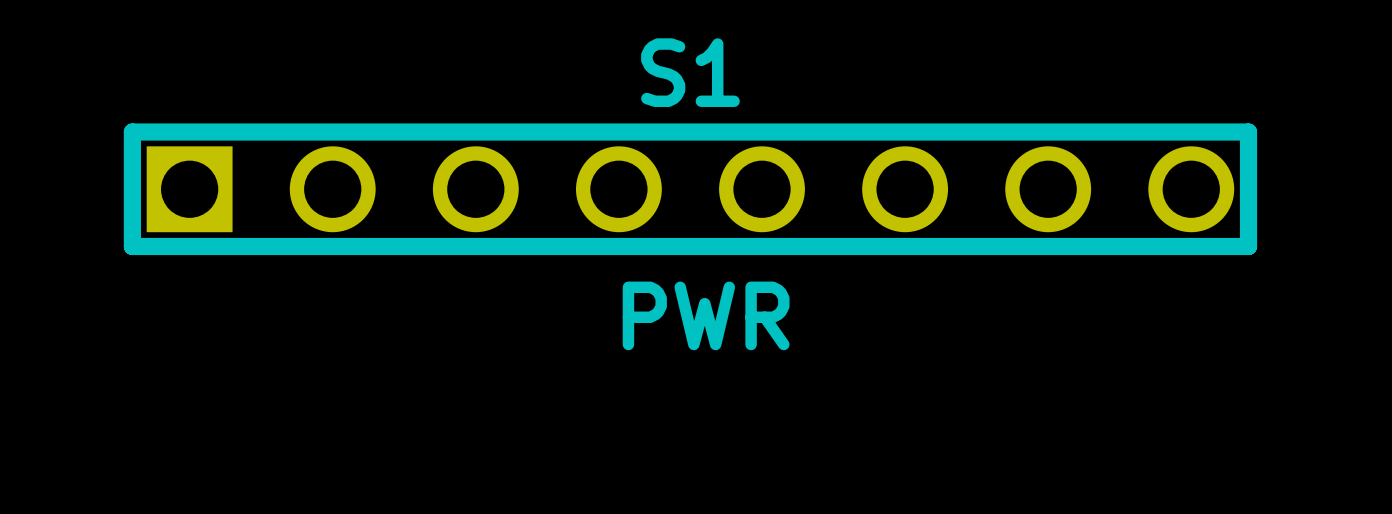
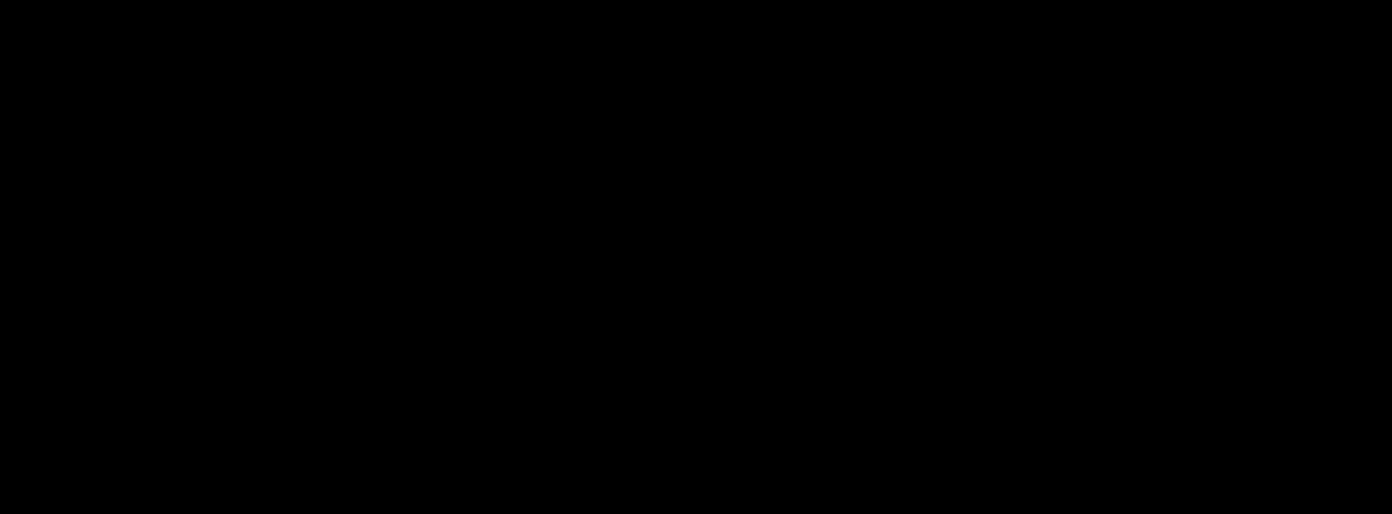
S1: PWR (690, 189) -> none

